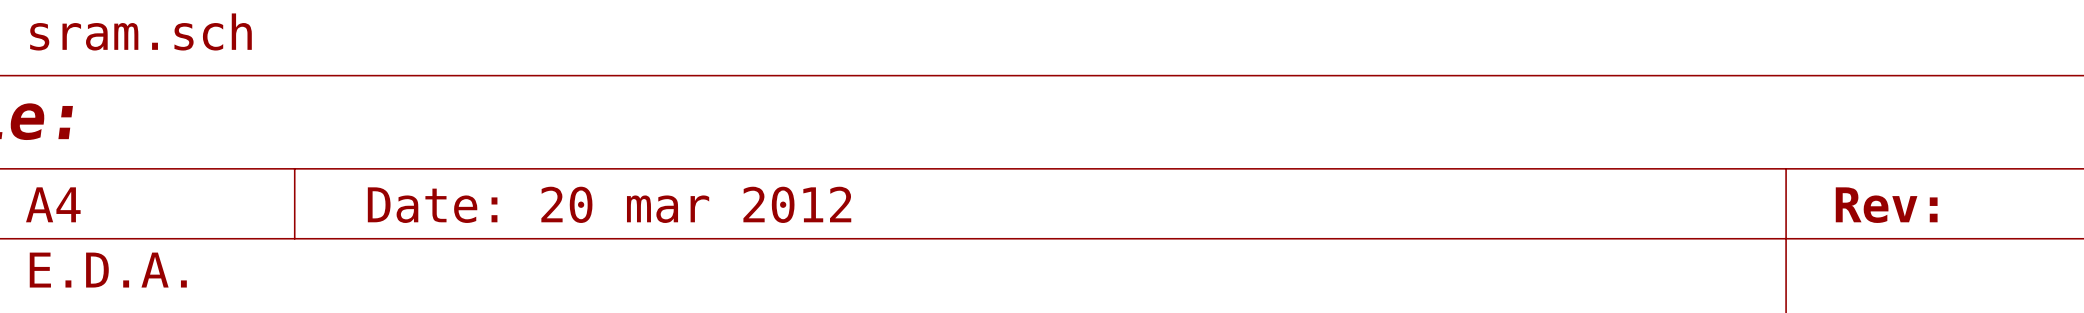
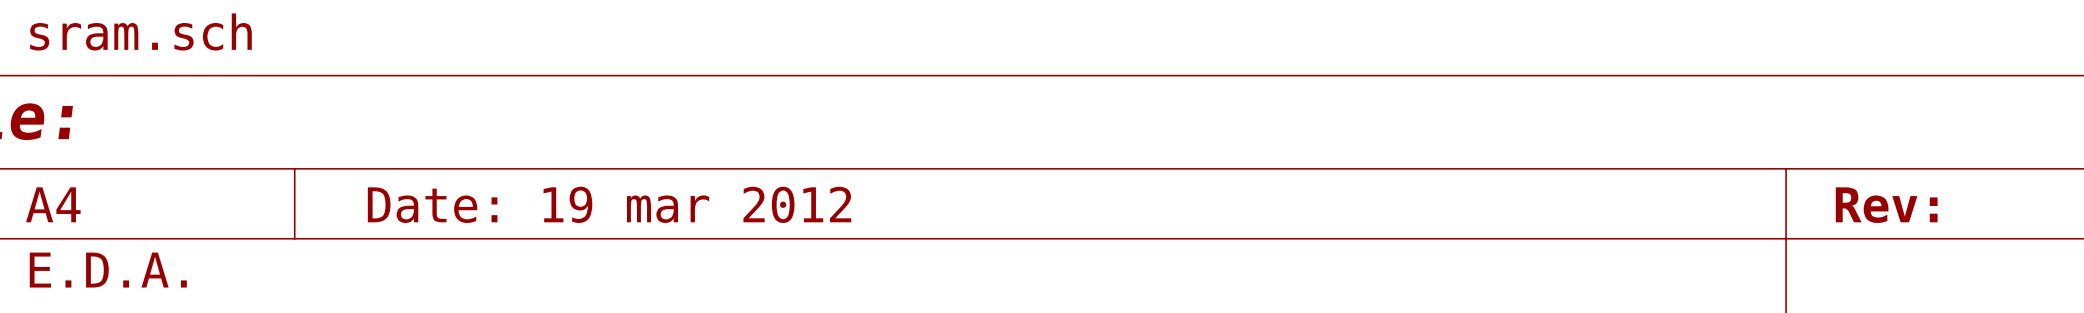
title block: Date: 20 mar 2012 (609, 204) -> Date: 19 mar 2012 (609, 204)

